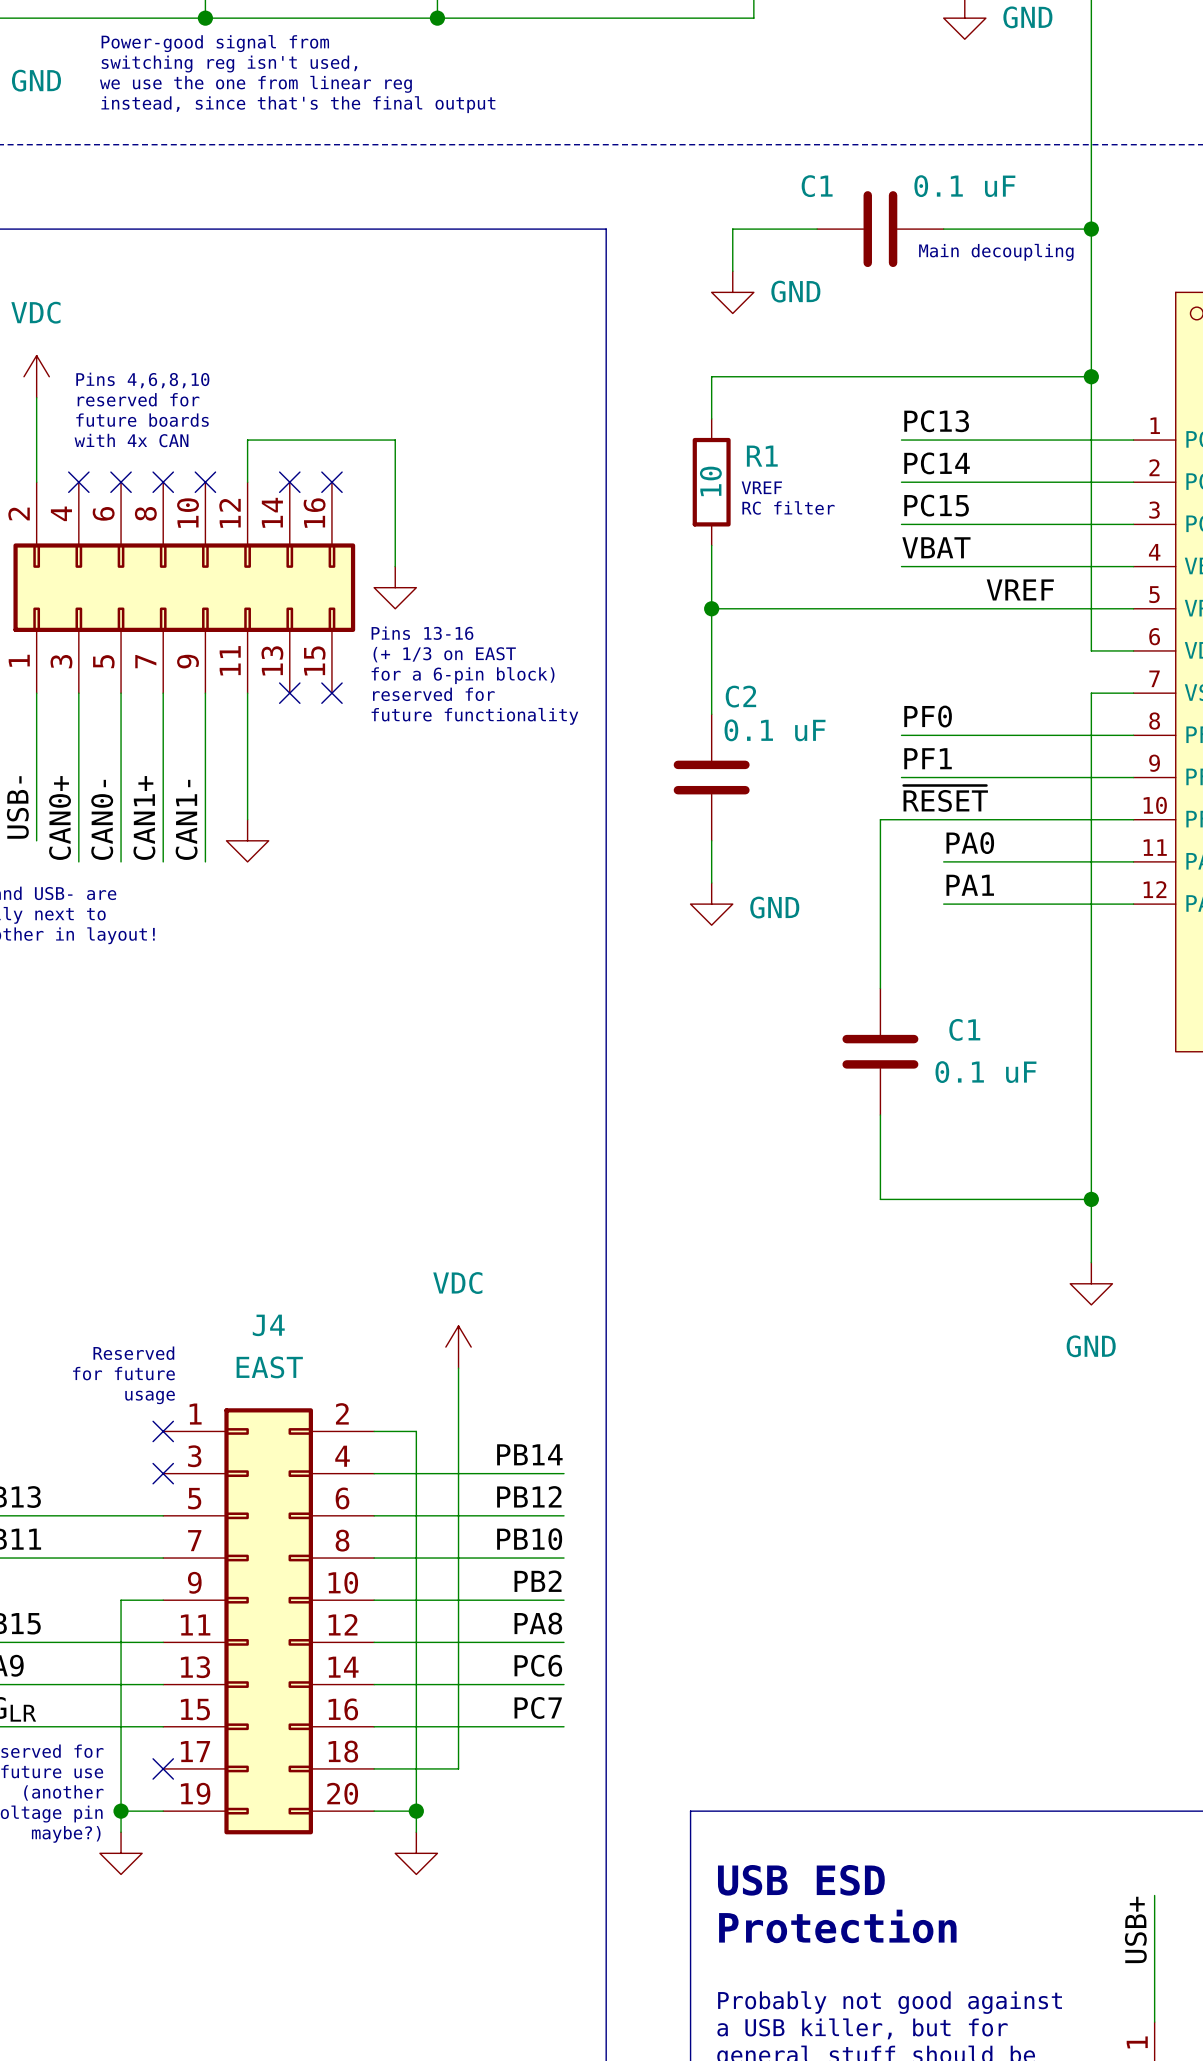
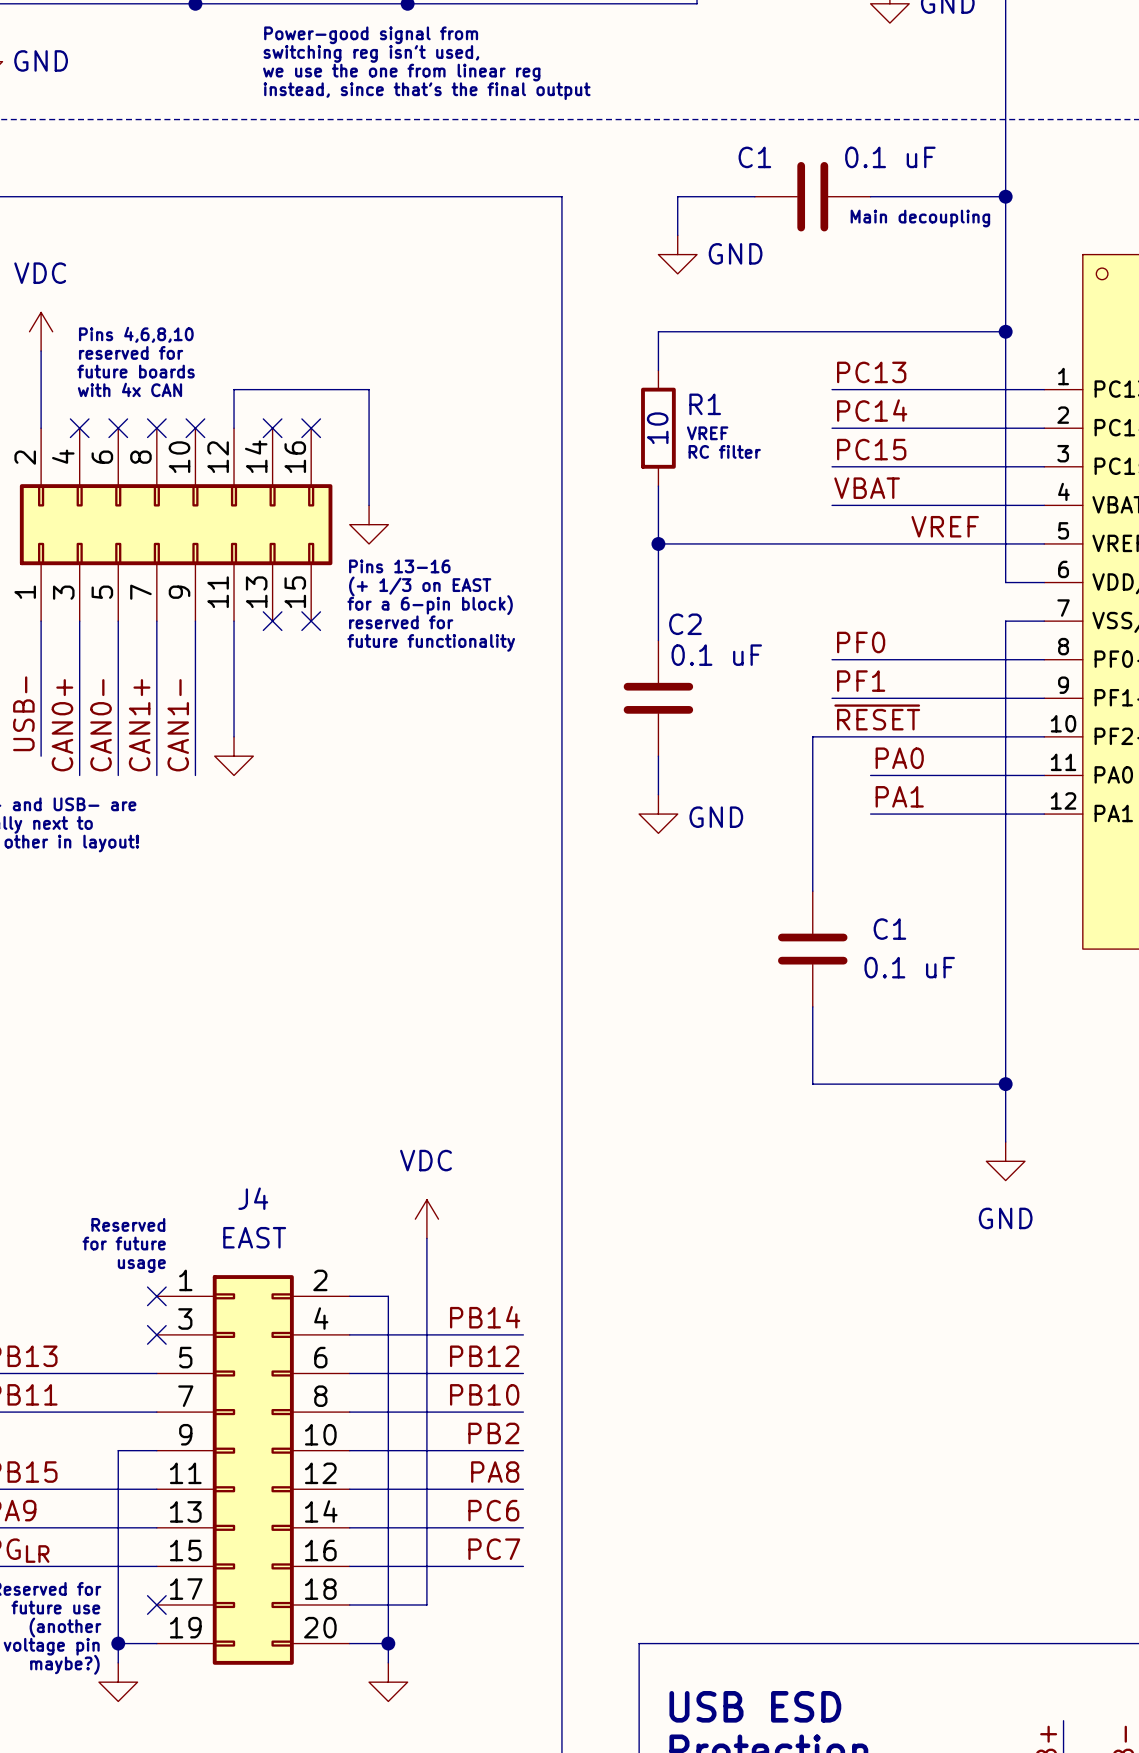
text position: Power-good signal from (215, 43) -> Power-good signal from (371, 35)
text position: switching reg isn't used, (229, 63) -> switching reg isn't used, (371, 53)
text position: we use the one from linear reg (255, 84) -> we use the one from linear reg (401, 72)
text position: instead, since that's the final output (298, 104) -> instead, since that's the final output (427, 91)

